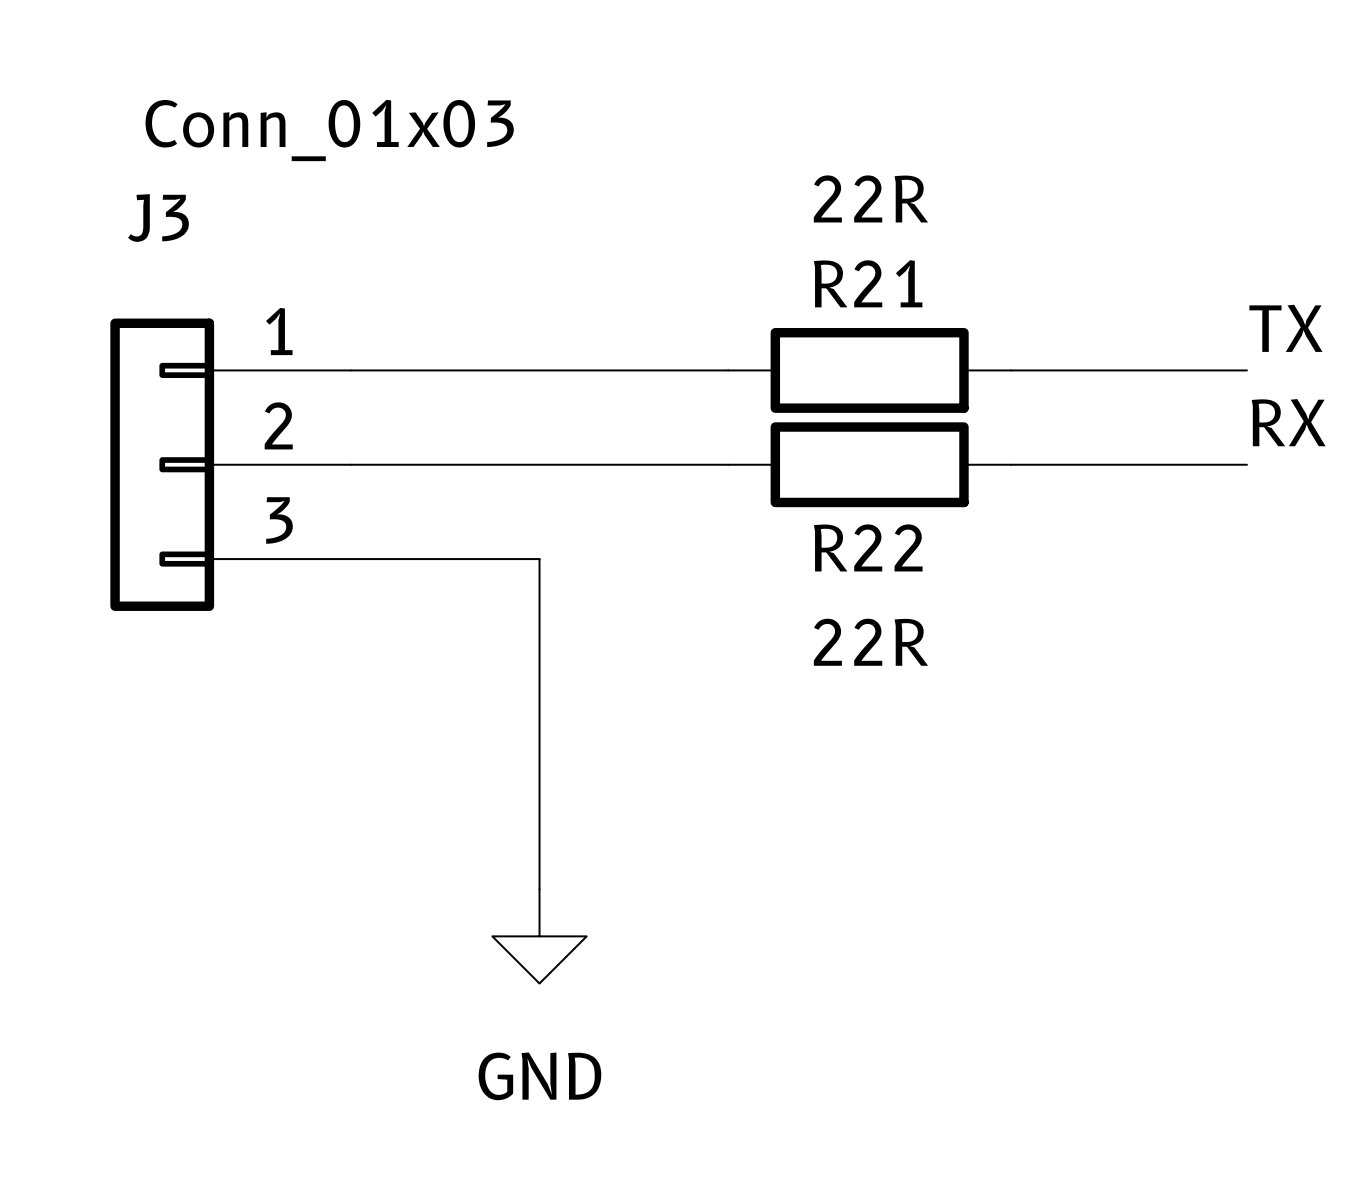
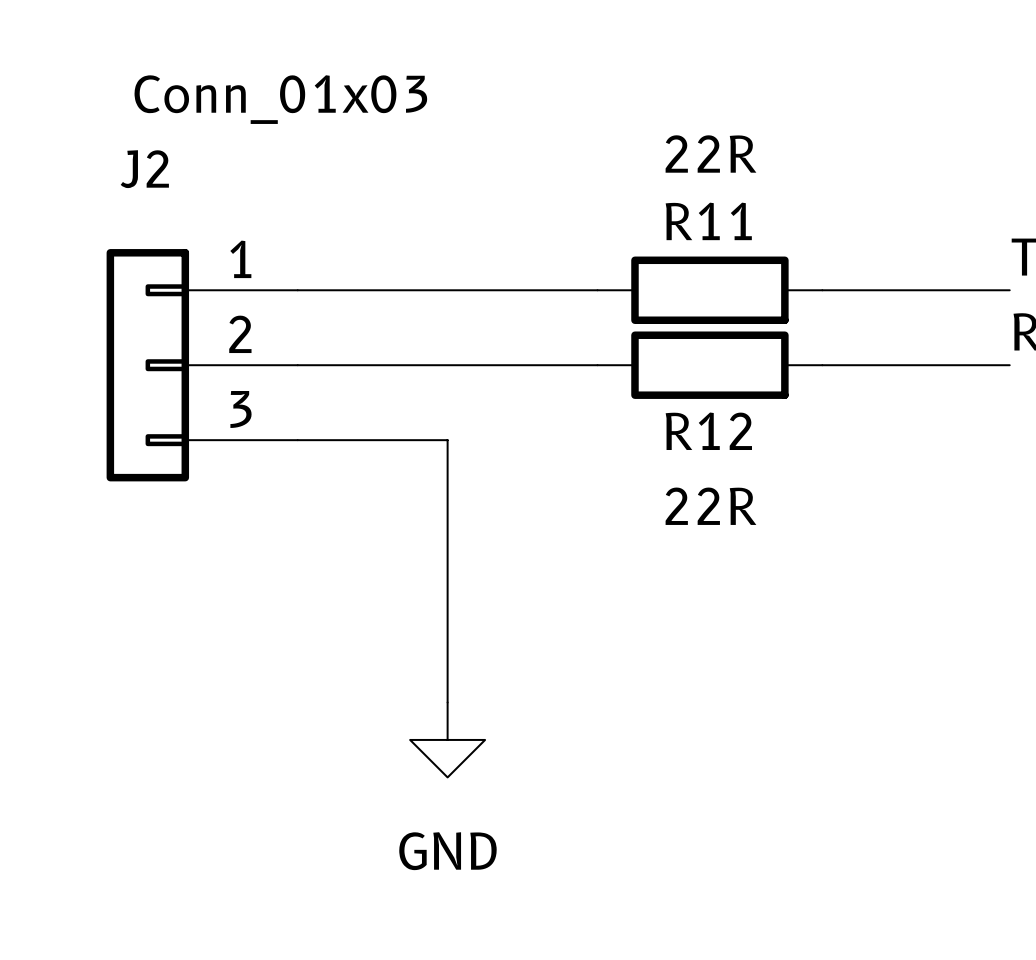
J3 name: J3 (158, 218) -> J2 (144, 169)
R21 name: R21 (868, 283) -> R11 (708, 221)
R22 name: R22 (868, 547) -> R12 (708, 431)

